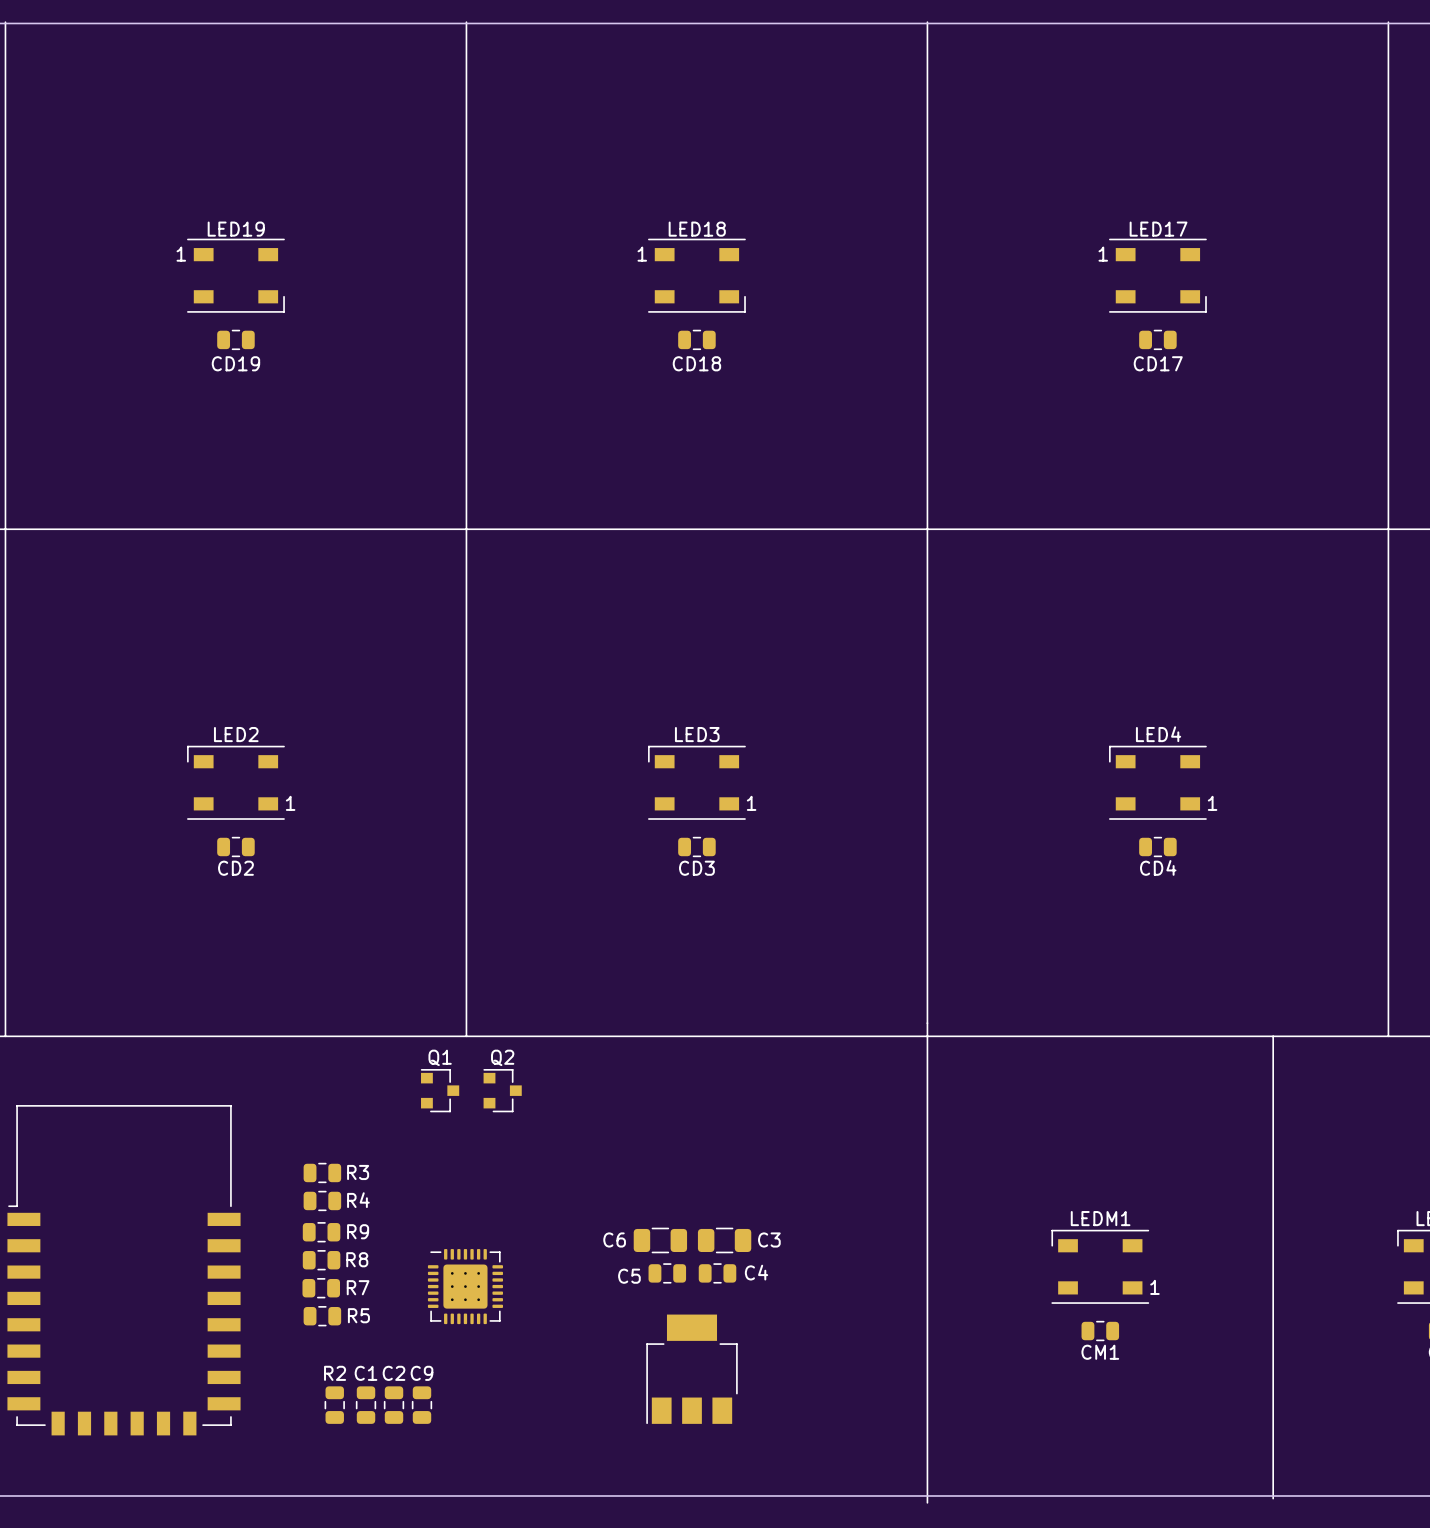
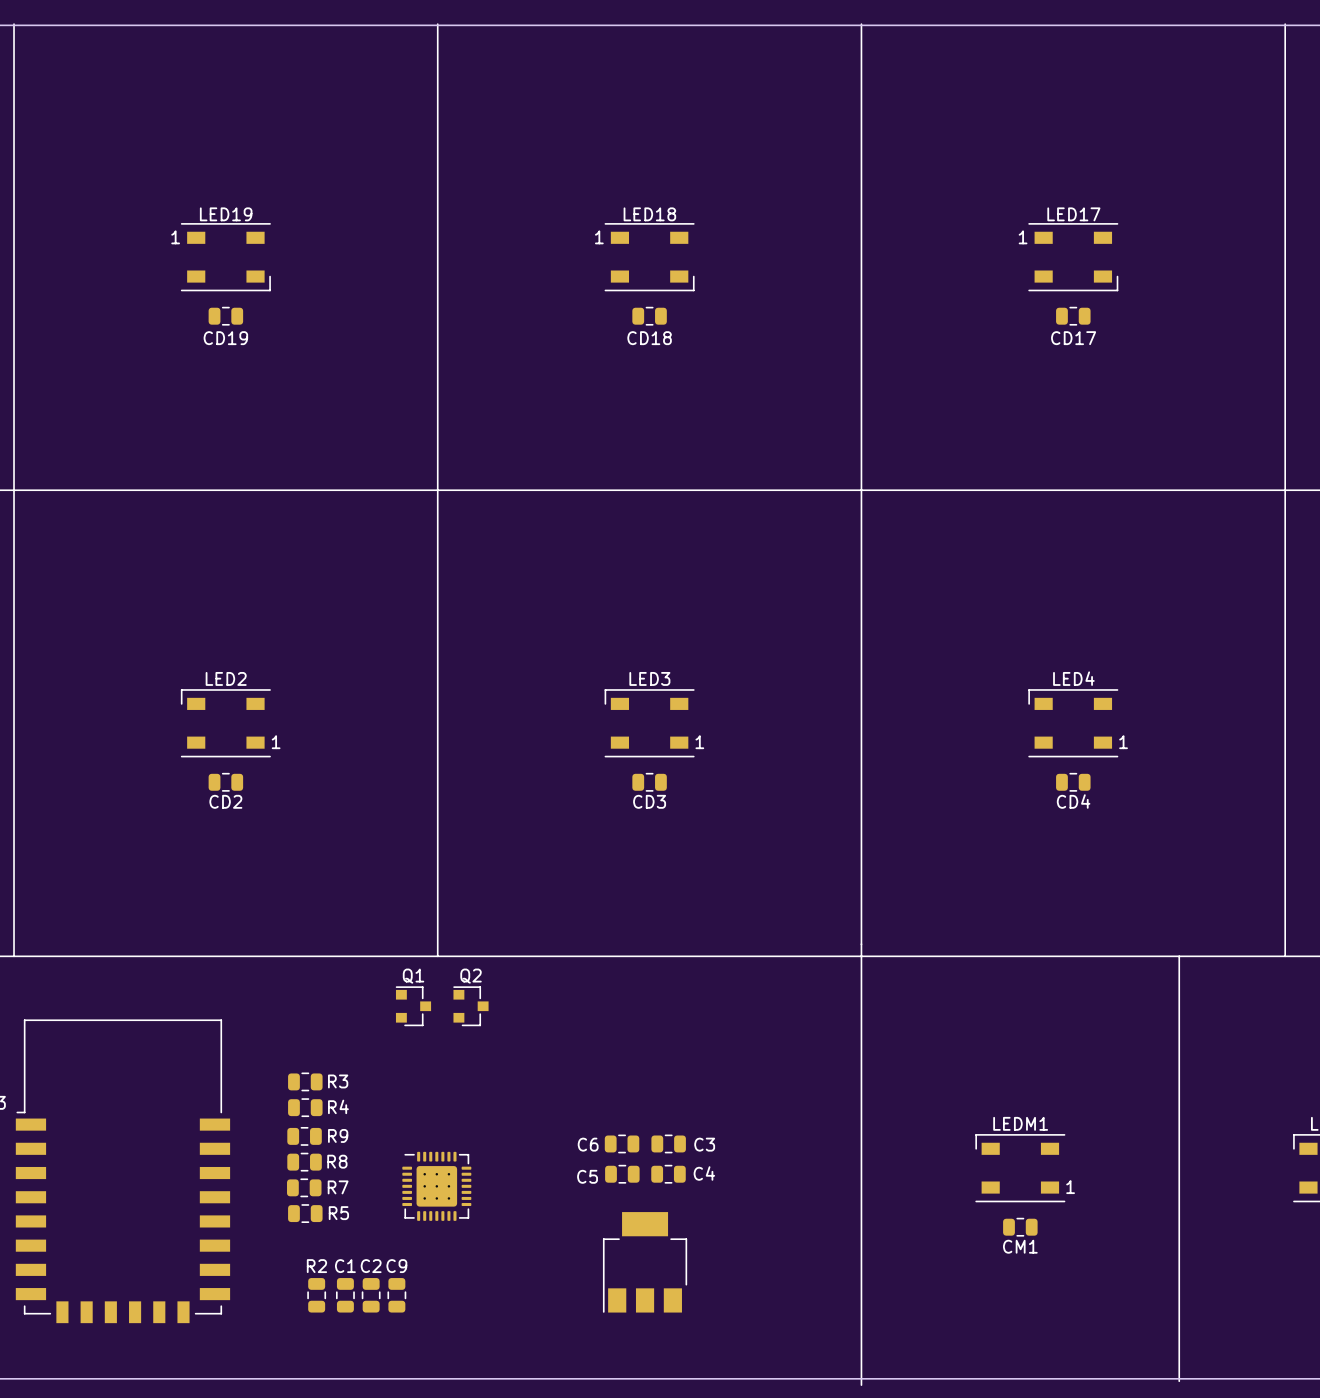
C6 footprint: [633, 1227, 688, 1254] -> [604, 1134, 640, 1154]
C3 footprint: [697, 1227, 752, 1254] -> [651, 1134, 686, 1154]

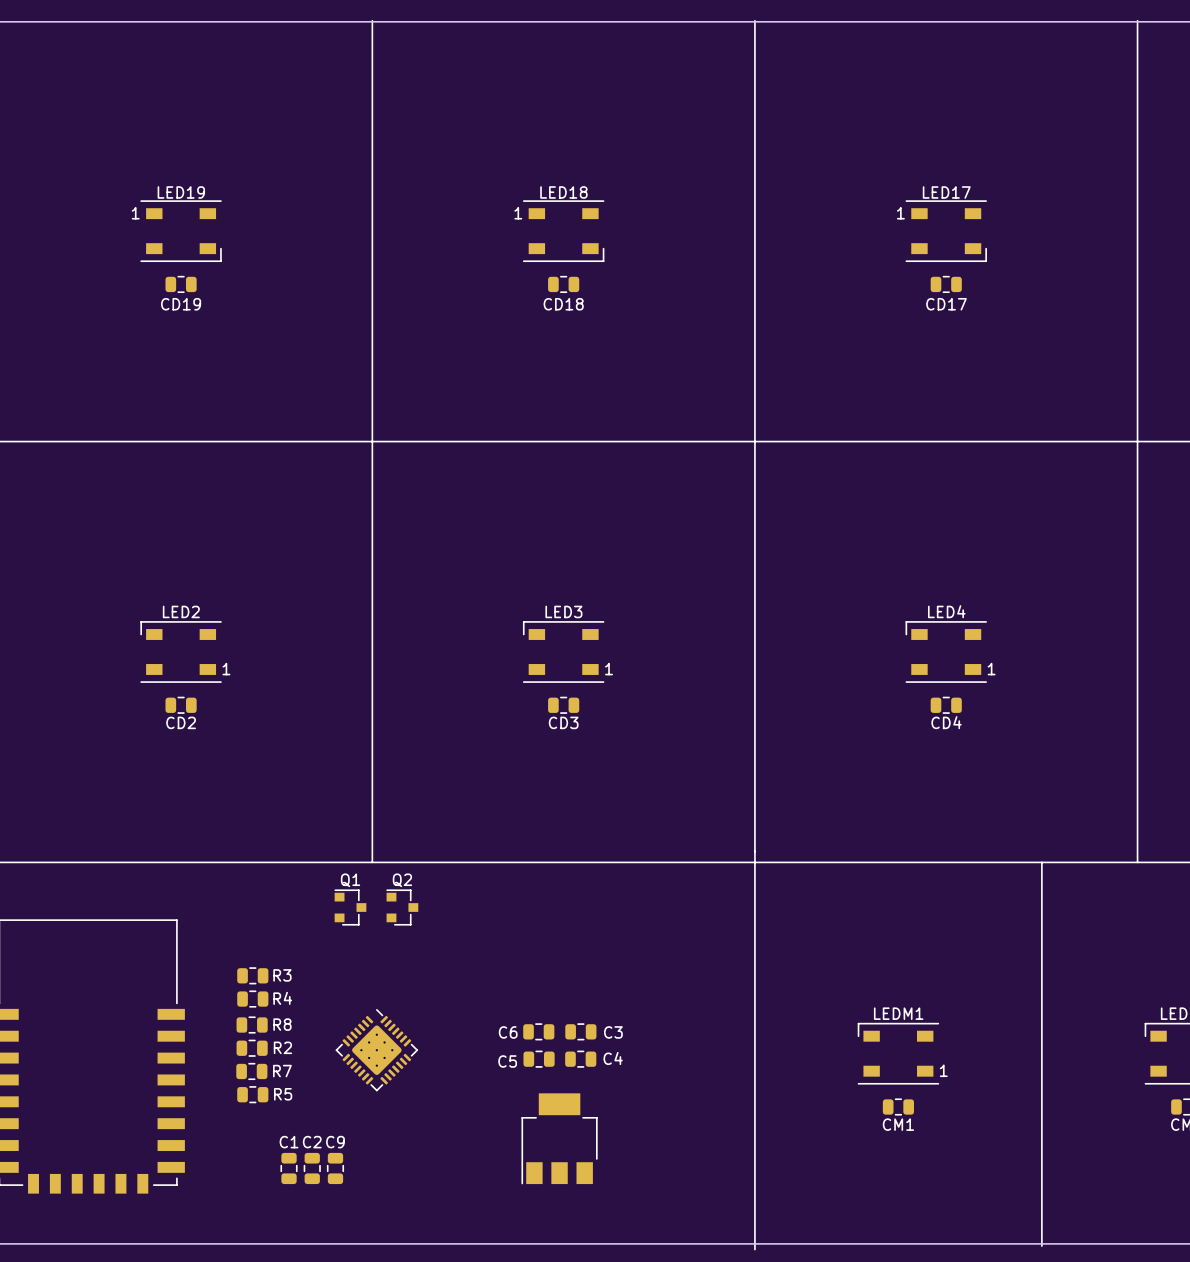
R9 name: R9 (338, 1135) -> R8 (282, 1024)
R8 name: R8 (337, 1161) -> R2 (282, 1047)
part: none -> (376, 1050)
part: (436, 1186) -> none
R2: (316, 1295) -> none

